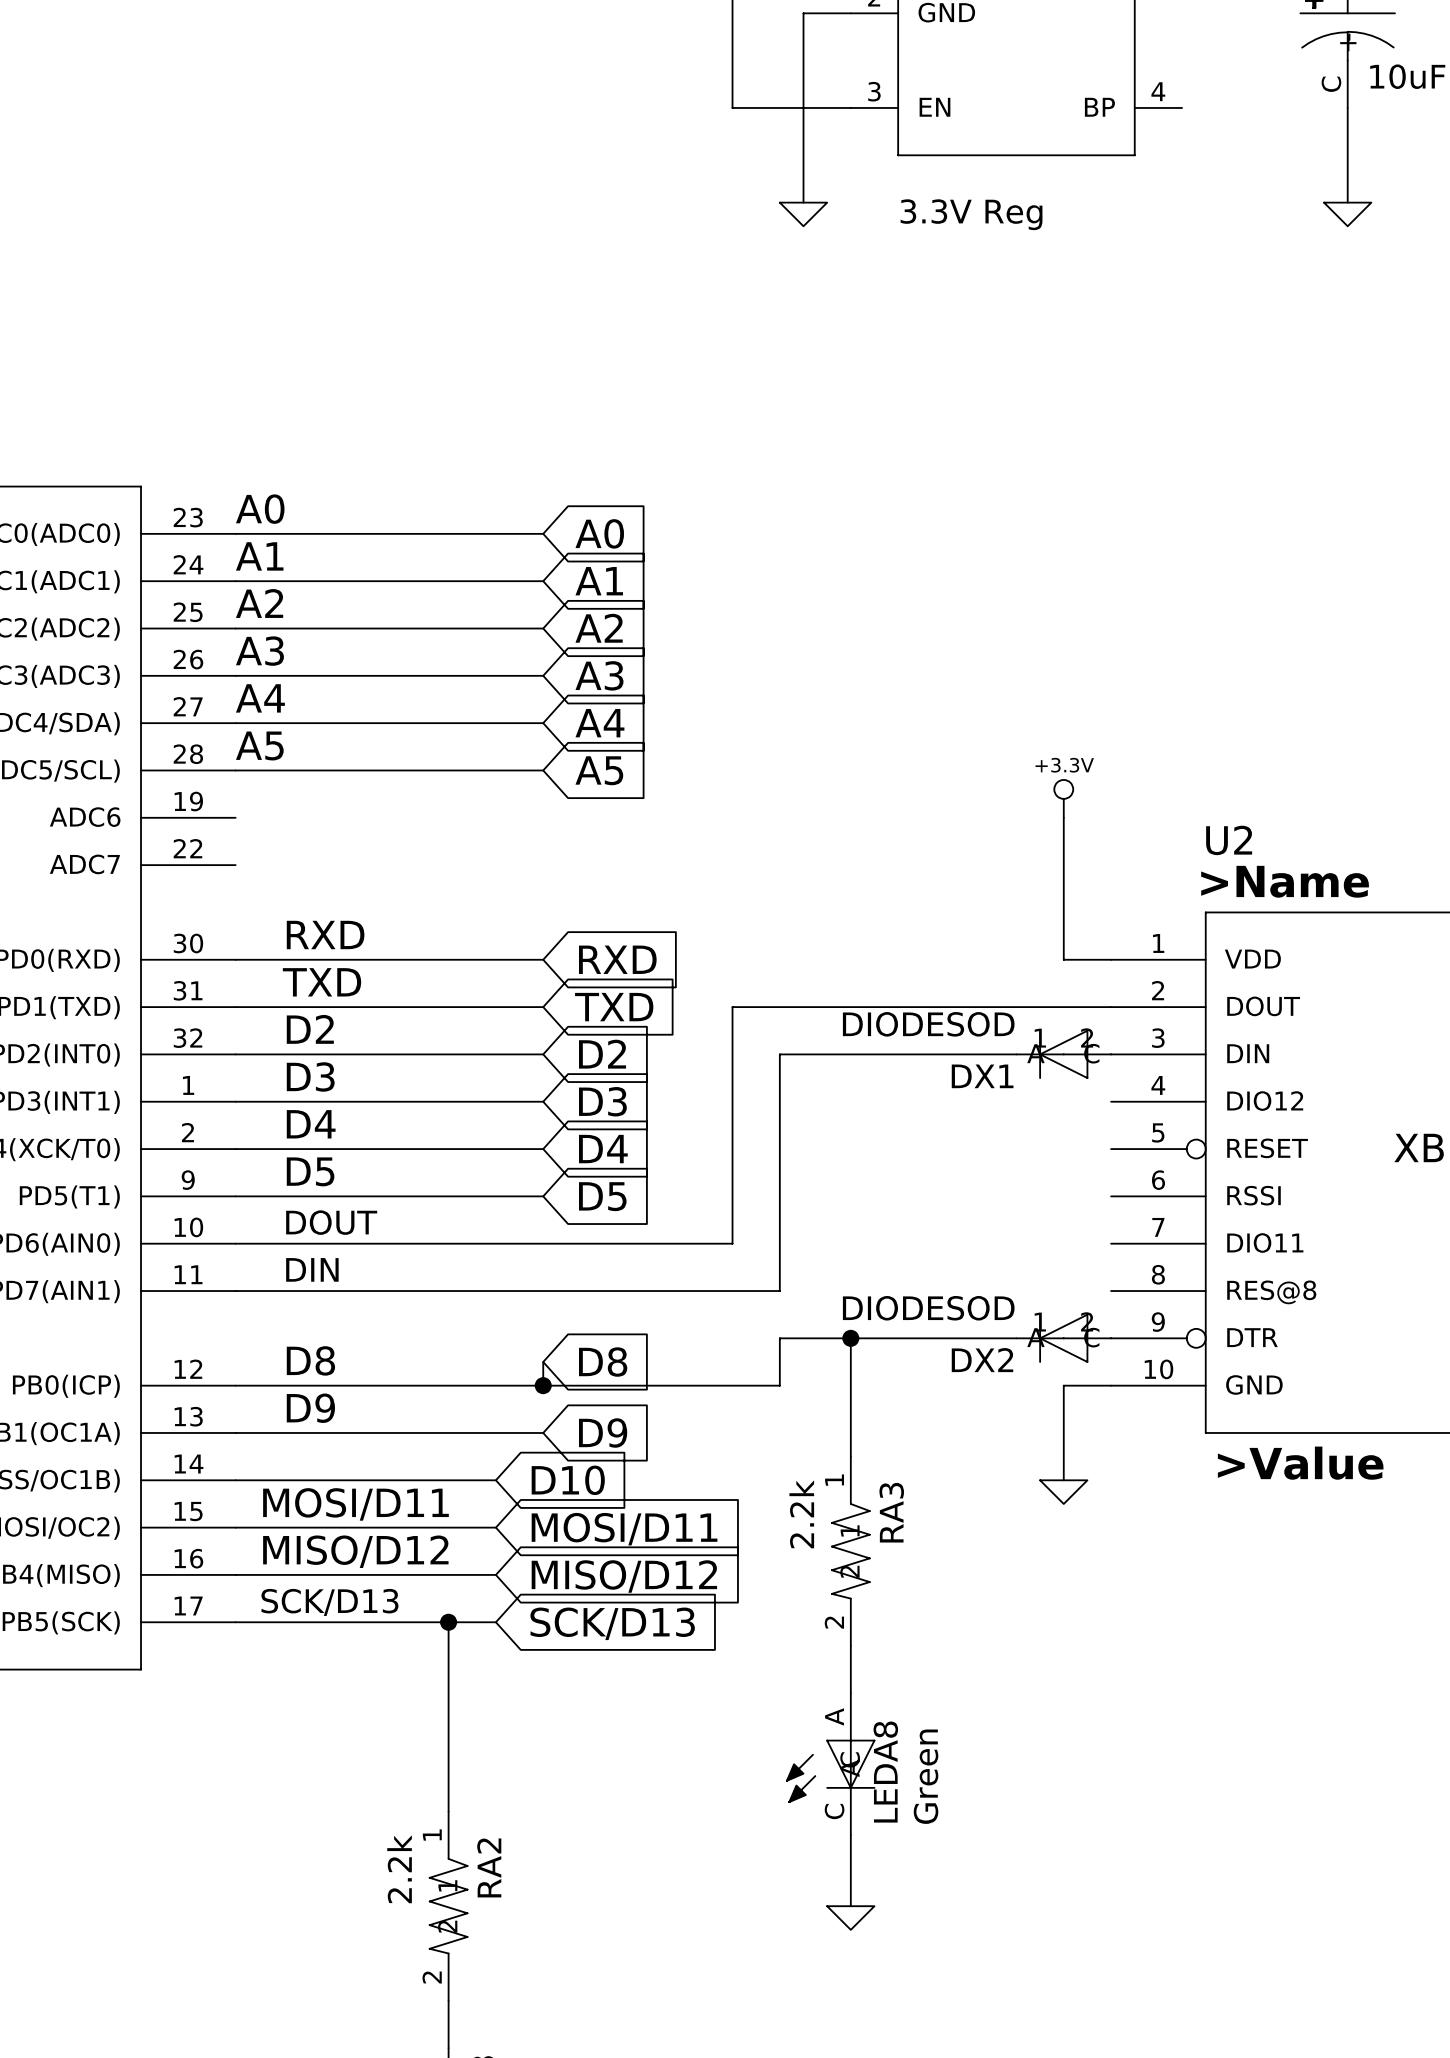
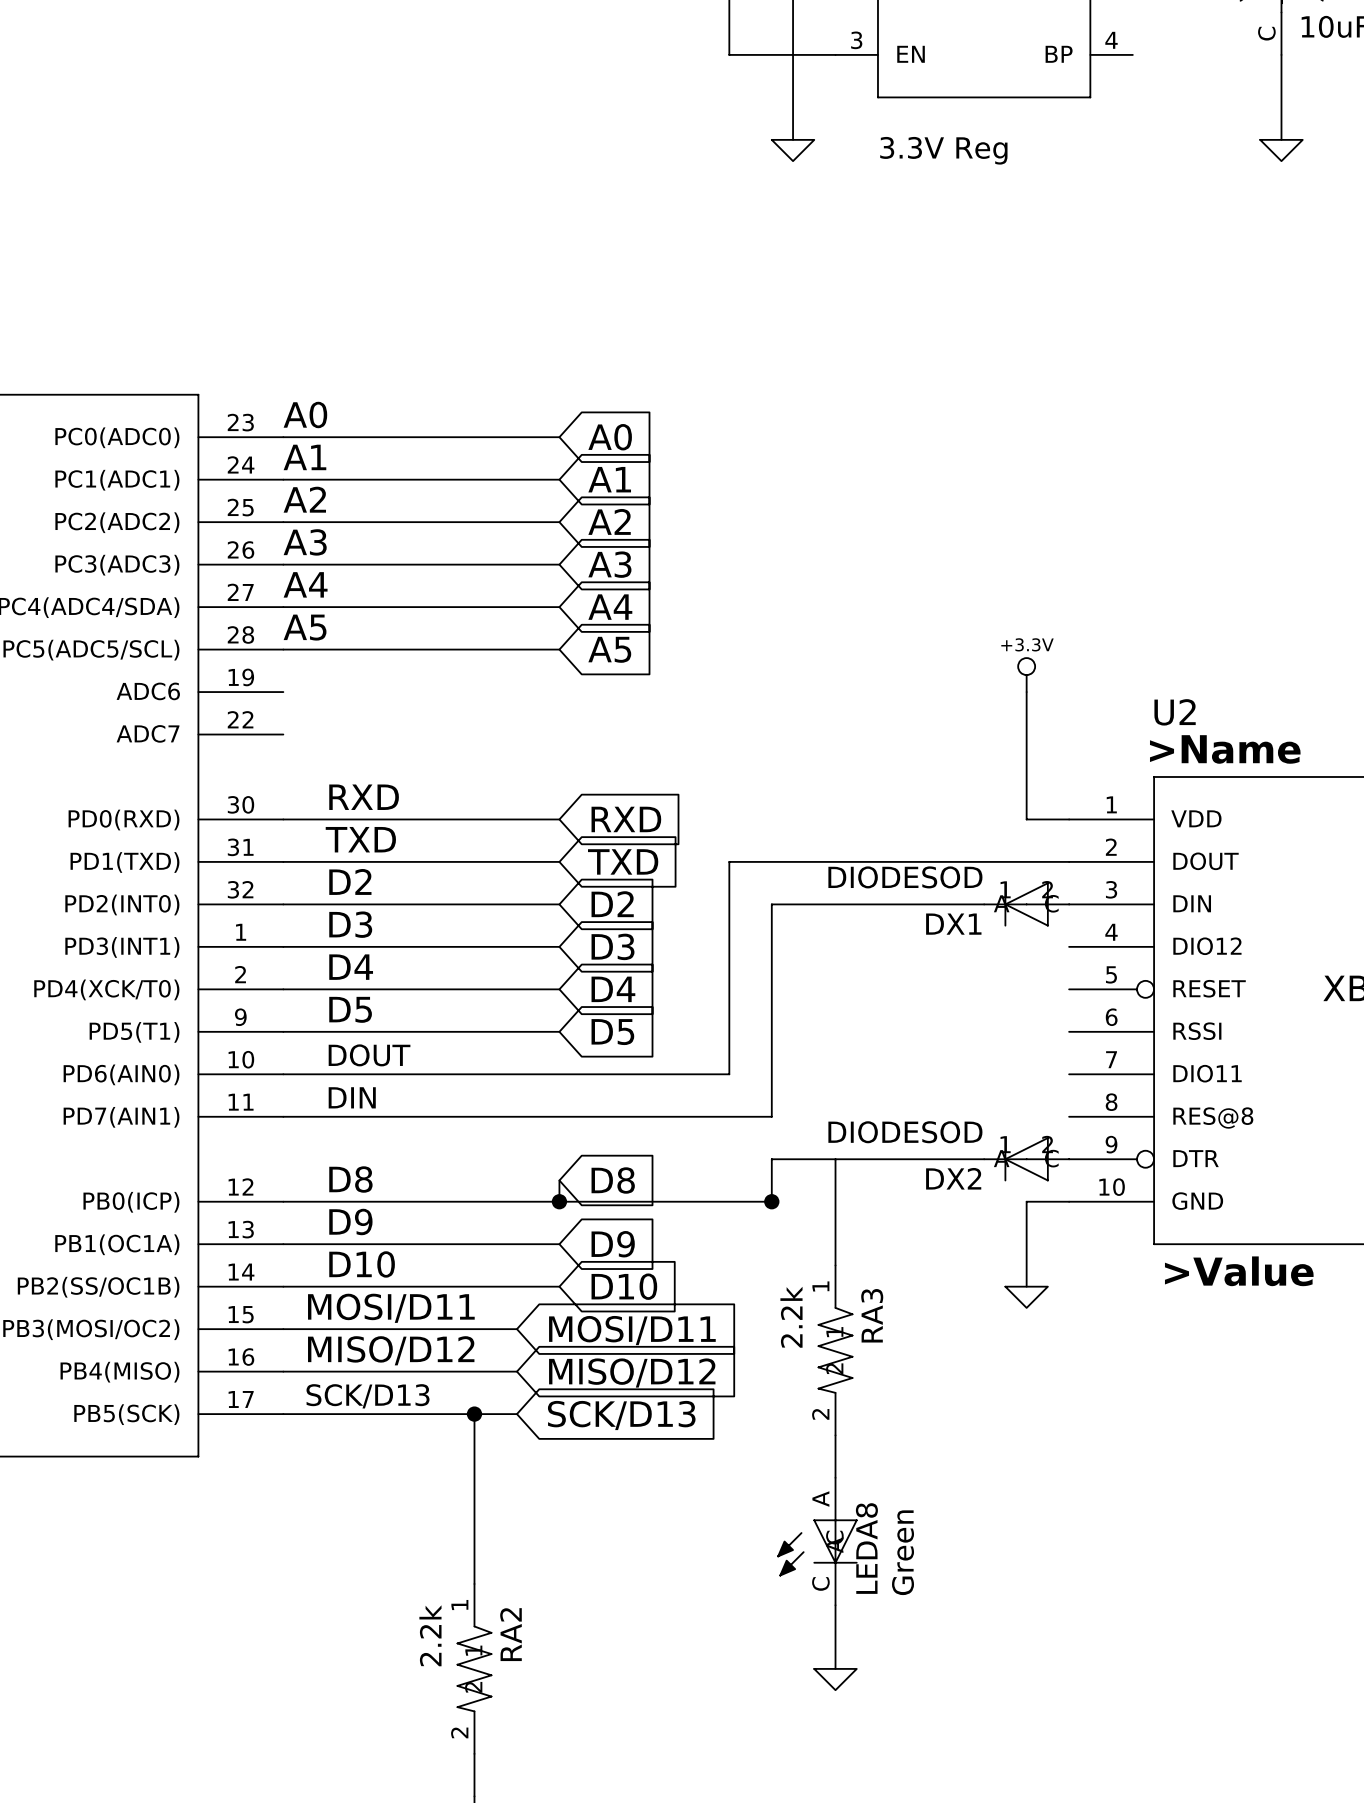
junction position: (850, 1338) -> (771, 1201)
label: none -> D10 (362, 1264)
wire: none -> (516, 1286) (559, 1286)
global label position: D10 (568, 1480) -> D10 (624, 1286)

